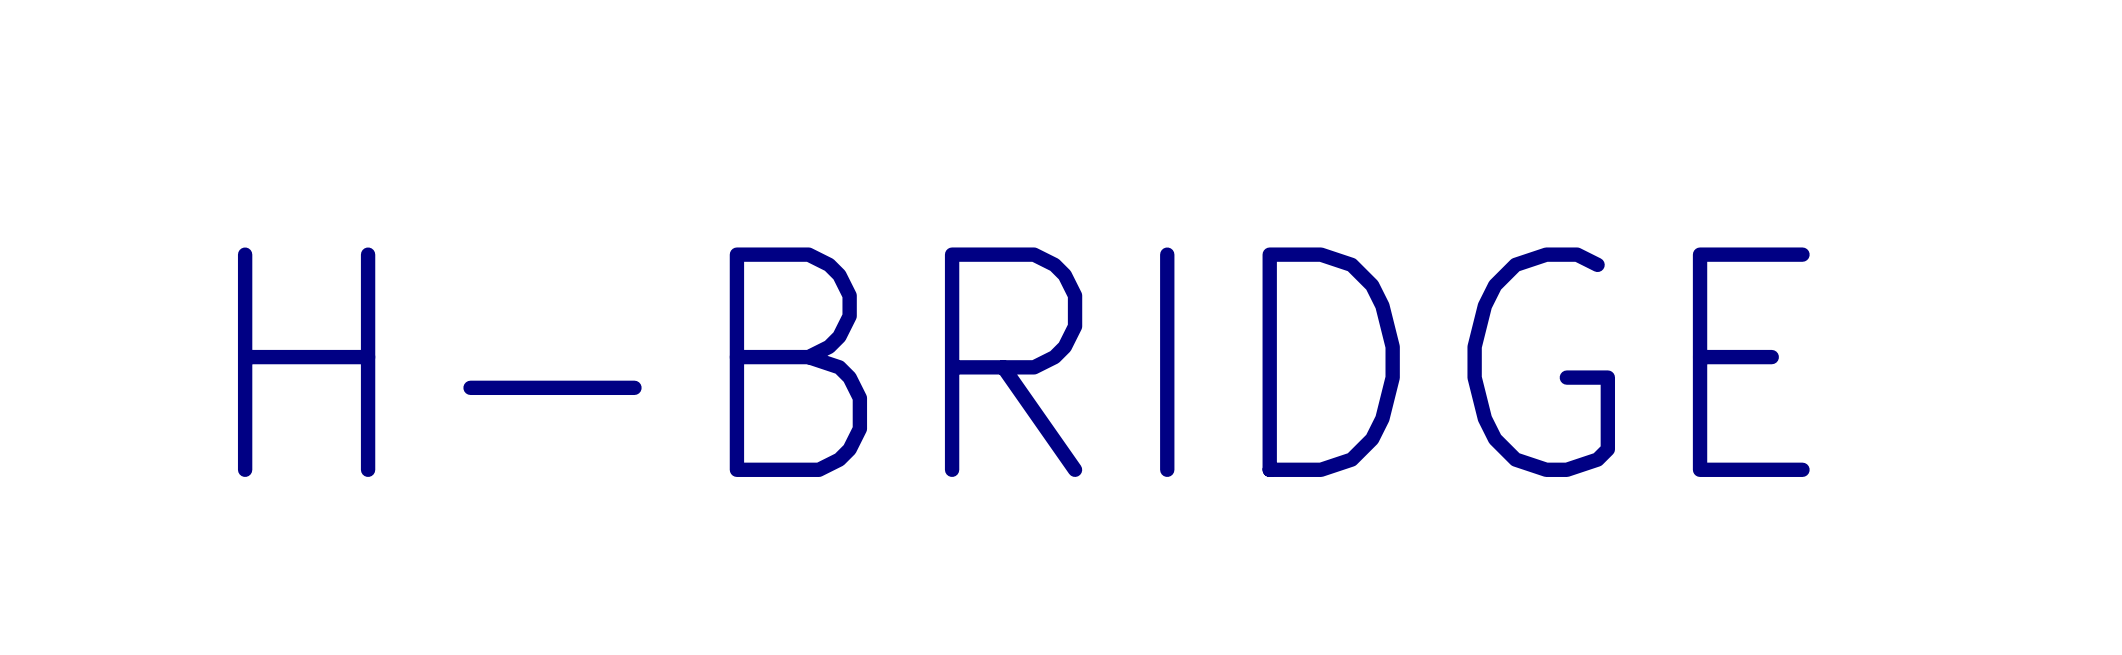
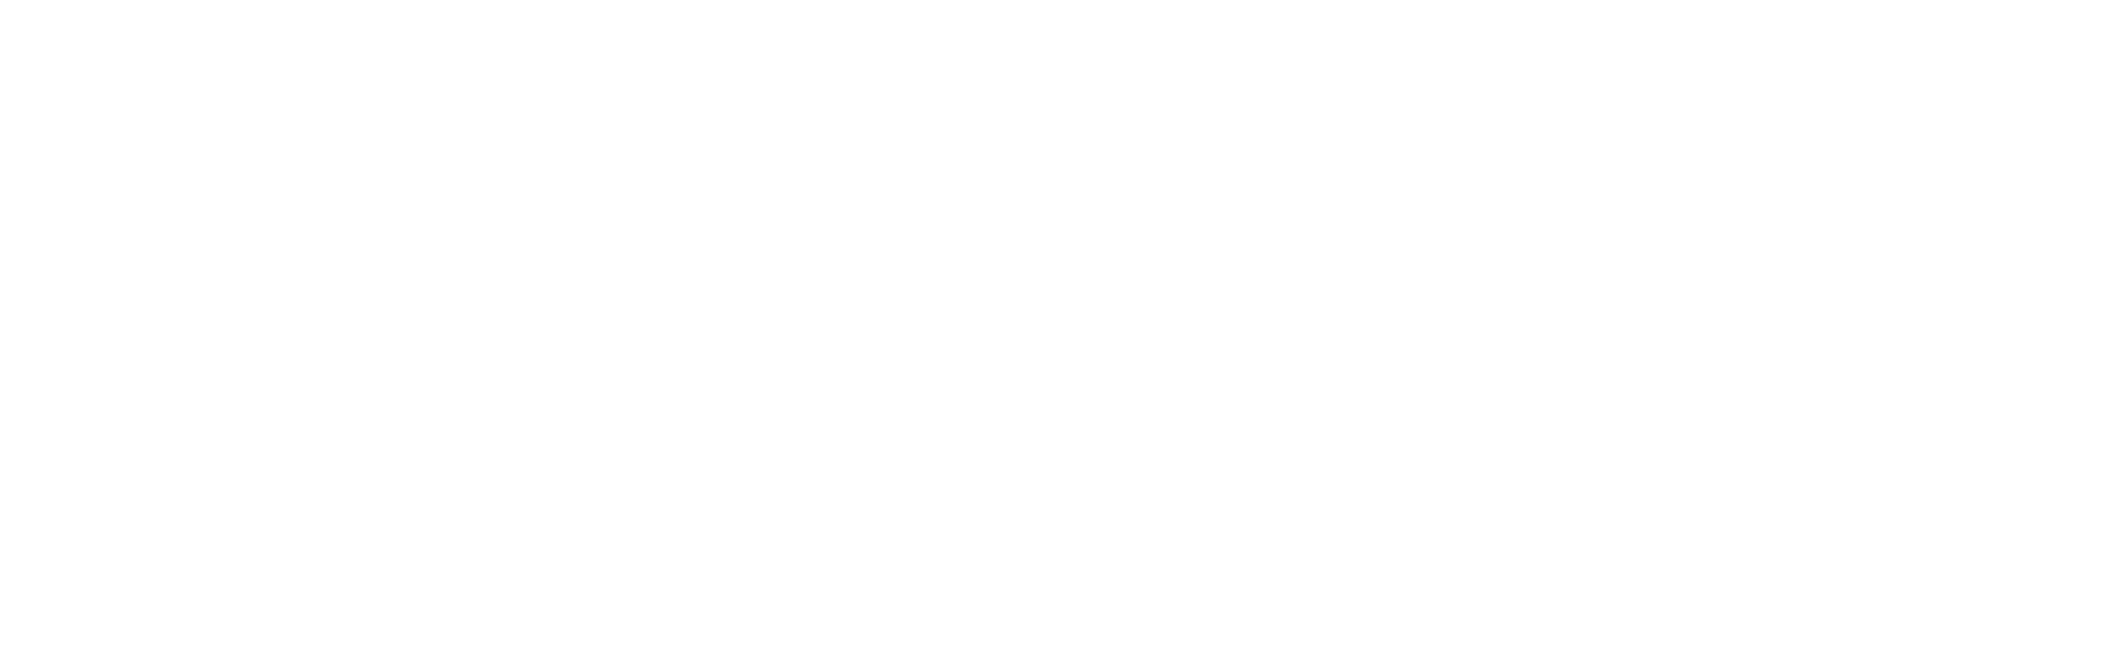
text: H-BRIDGE (1023, 362) -> none

